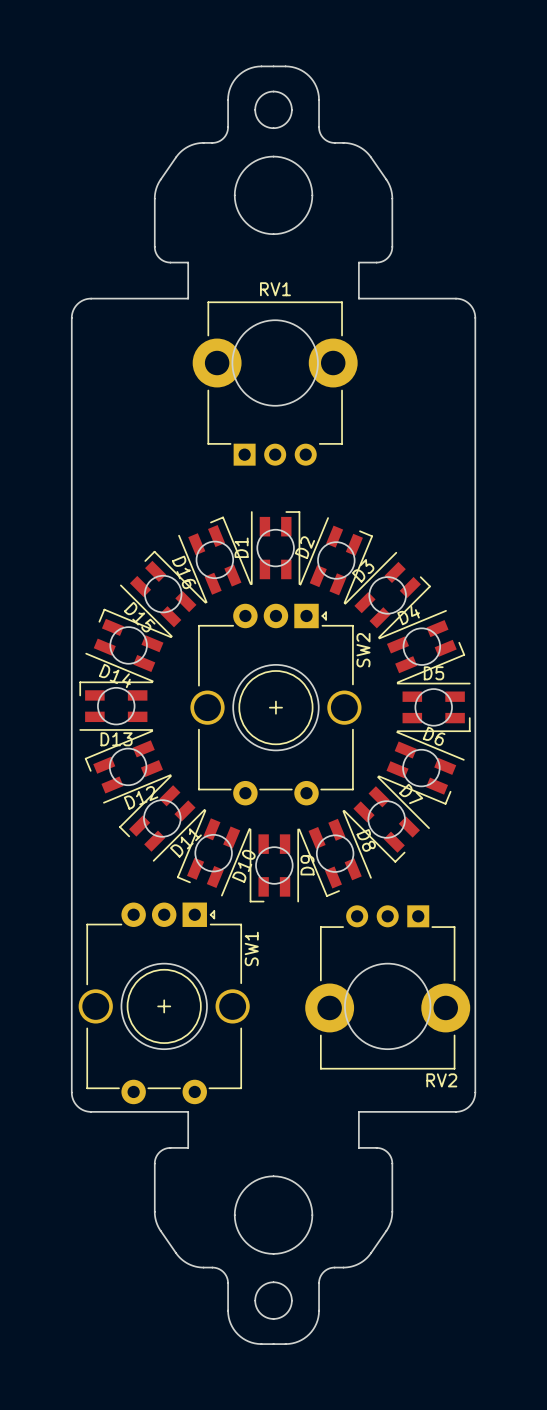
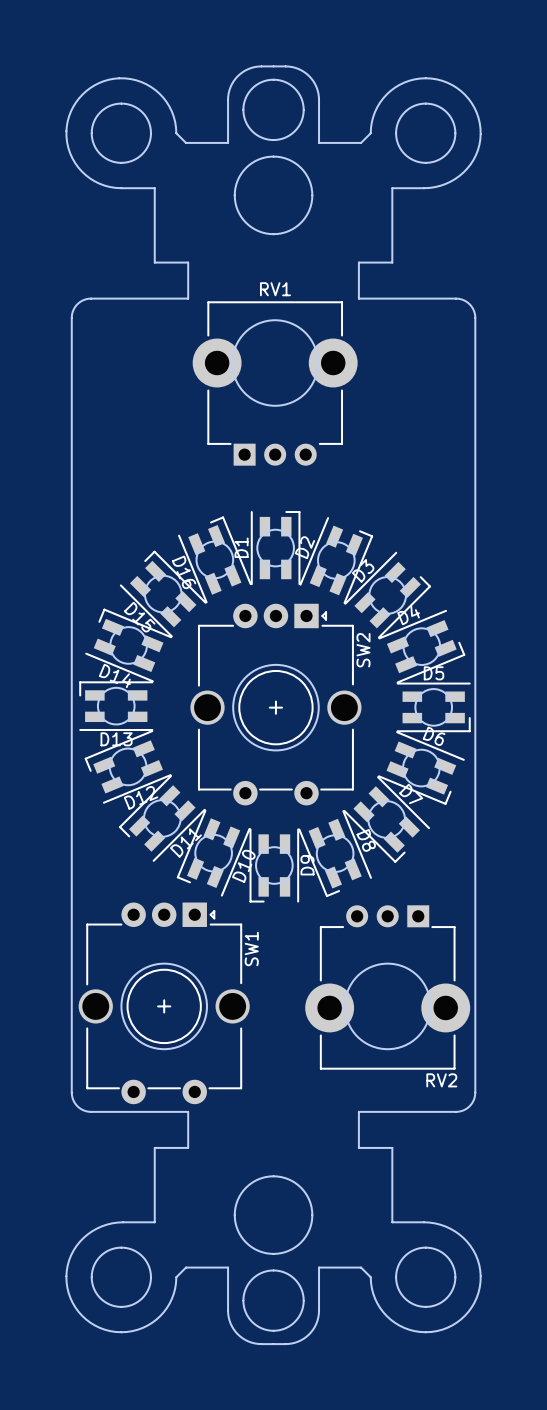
board edge: none -> (273, 79) (261, 82) (252, 88) (245, 98) (243, 109) (245, 121) (252, 131) (261, 137) (273, 140) (285, 137) (294, 131) (301, 121) (303, 109) (301, 98) (294, 88) (285, 82) (273, 79)
board edge: (273, 91) (260, 96) (255, 109) (260, 122) (273, 128) (286, 122) (291, 109) (286, 96) (273, 91) -> none
board edge: none -> (121, 103) (132, 105) (142, 112) (148, 121) (150, 133) (148, 144) (142, 154) (132, 160) (121, 162) (109, 160) (100, 154) (94, 144) (91, 133) (94, 121) (100, 112) (109, 105) (121, 103)
board edge: none -> (425, 103) (414, 105) (404, 112) (398, 121) (396, 133) (398, 144) (404, 154) (414, 160) (425, 162) (437, 160) (446, 154) (453, 144) (455, 133) (453, 121) (446, 112) (437, 105) (425, 103)
board edge: (188, 298) (188, 262) (165, 261) (159, 257) (155, 251) (154, 197) (157, 185) (177, 155) (184, 148) (197, 143) (217, 142) (225, 136) (227, 128) (228, 93) (232, 83) (240, 74) (254, 67) (289, 66) (304, 72) (316, 86) (318, 96) (319, 128) (322, 137) (330, 142) (351, 143) (364, 150) (371, 157) (390, 188) (391, 251) (387, 257) (381, 261) (358, 262) (358, 298) (459, 298) (470, 305) (475, 317) (474, 1098) (468, 1107) (457, 1111) (358, 1111) (358, 1147) (381, 1148) (387, 1152) (391, 1158) (390, 1221) (371, 1253) (364, 1260) (351, 1266) (330, 1268) (322, 1273) (319, 1281) (318, 1314) (315, 1326) (301, 1340) (285, 1344) (254, 1343) (237, 1334) (228, 1317) (227, 1281) (225, 1274) (217, 1268) (197, 1267) (184, 1261) (177, 1254) (157, 1225) (154, 1213) (155, 1158) (159, 1152) (165, 1148) (188, 1147) (188, 1111) -> (188, 298) (188, 262) (154, 262) (154, 188) (121, 188) (104, 185) (85, 175) (72, 158) (67, 142) (67, 120) (76, 102) (90, 88) (103, 81) (119, 78) (130, 79) (146, 84) (155, 90) (166, 101) (173, 116) (176, 133) (186, 142) (228, 142) (228, 99) (230, 86) (242, 72) (258, 66) (292, 67) (301, 70) (311, 78) (318, 96) (319, 142) (361, 142) (370, 133) (373, 116) (383, 98) (394, 87) (409, 80) (425, 78) (442, 80) (456, 87) (471, 102) (478, 117) (480, 134) (477, 150) (470, 164) (455, 179) (440, 185) (429, 187) (392, 188) (392, 262) (358, 262) (358, 298) (457, 298) (469, 304) (475, 315) (475, 1094) (469, 1106) (457, 1111) (358, 1111) (358, 1147) (392, 1147) (392, 1222) (429, 1222) (440, 1224) (459, 1234) (473, 1250) (479, 1265) (480, 1276) (478, 1292) (471, 1307) (456, 1322) (442, 1329) (425, 1332) (409, 1329) (394, 1322) (383, 1312) (373, 1293) (370, 1277) (361, 1267) (319, 1267) (318, 1314) (311, 1331) (301, 1340) (292, 1343) (258, 1343) (242, 1338) (230, 1323) (228, 1310) (228, 1267) (186, 1267) (176, 1277) (173, 1293) (166, 1308) (156, 1319) (147, 1325) (132, 1331) (115, 1331) (104, 1329) (90, 1322) (75, 1307) (68, 1292) (66, 1276) (71, 1255) (83, 1237) (101, 1226) (117, 1222) (154, 1222) (154, 1147) (188, 1147) (188, 1111)
board edge: none -> (121, 1247) (132, 1249) (142, 1256) (148, 1265) (150, 1277) (148, 1288) (142, 1298) (132, 1304) (121, 1306) (109, 1304) (100, 1298) (94, 1288) (91, 1277) (94, 1265) (100, 1256) (109, 1249) (121, 1247)
board edge: none -> (425, 1247) (437, 1249) (446, 1256) (453, 1265) (455, 1277) (453, 1288) (446, 1298) (437, 1304) (425, 1306) (414, 1304) (404, 1298) (398, 1288) (396, 1277) (398, 1265) (404, 1256) (414, 1249) (425, 1247)
board edge: none -> (273, 1270) (285, 1272) (294, 1279) (301, 1288) (303, 1300) (301, 1312) (294, 1321) (285, 1328) (273, 1330) (261, 1328) (252, 1321) (245, 1312) (243, 1300) (245, 1288) (252, 1279) (261, 1272) (273, 1270)
board edge: (273, 1282) (286, 1287) (291, 1300) (286, 1313) (273, 1318) (260, 1313) (255, 1300) (260, 1287) (273, 1282) -> none

